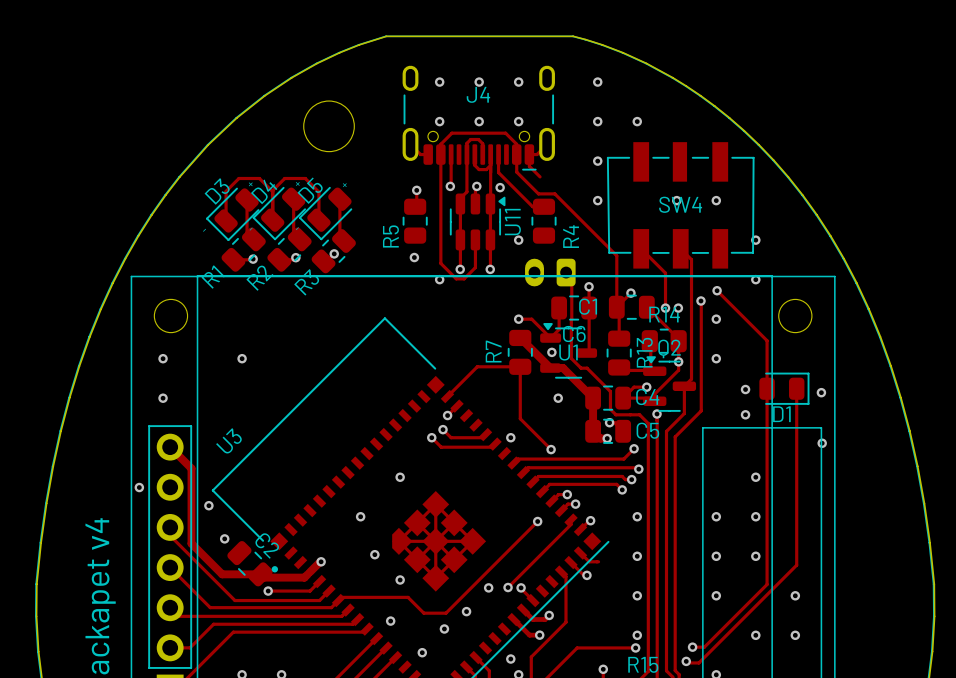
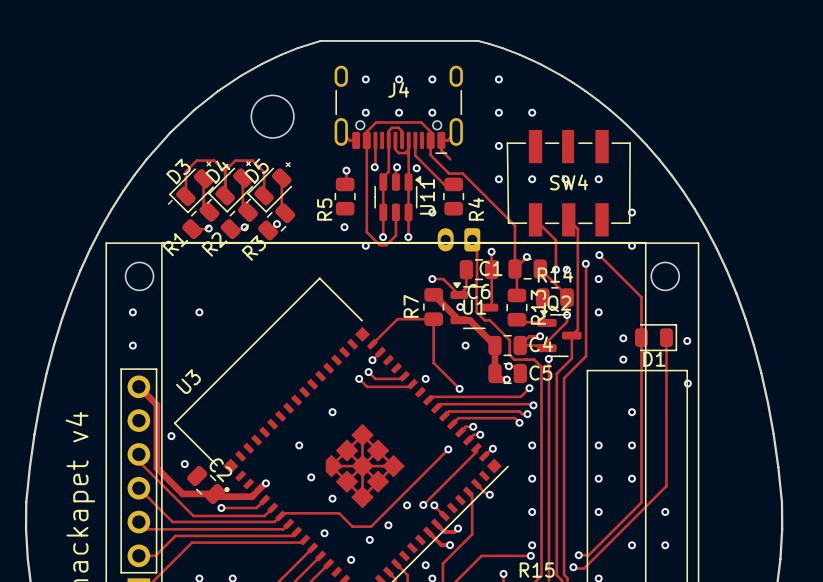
via: none -> (532, 179)
via: (139, 487) -> none
track: (580, 553) (589, 561) (598, 561) -> none

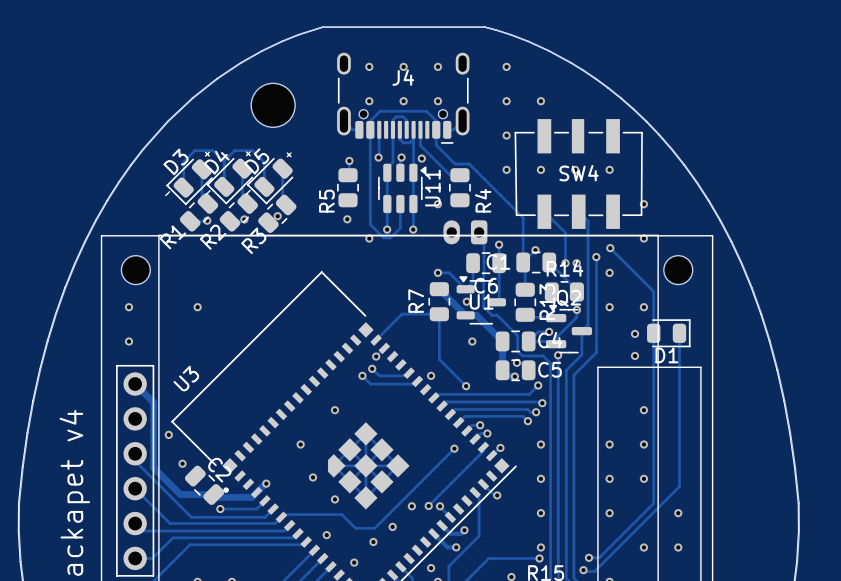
track: (441, 140) (441, 150) (450, 159) -> none
via: none -> (643, 307)
via: (687, 340) -> none
via: (687, 383) -> none

